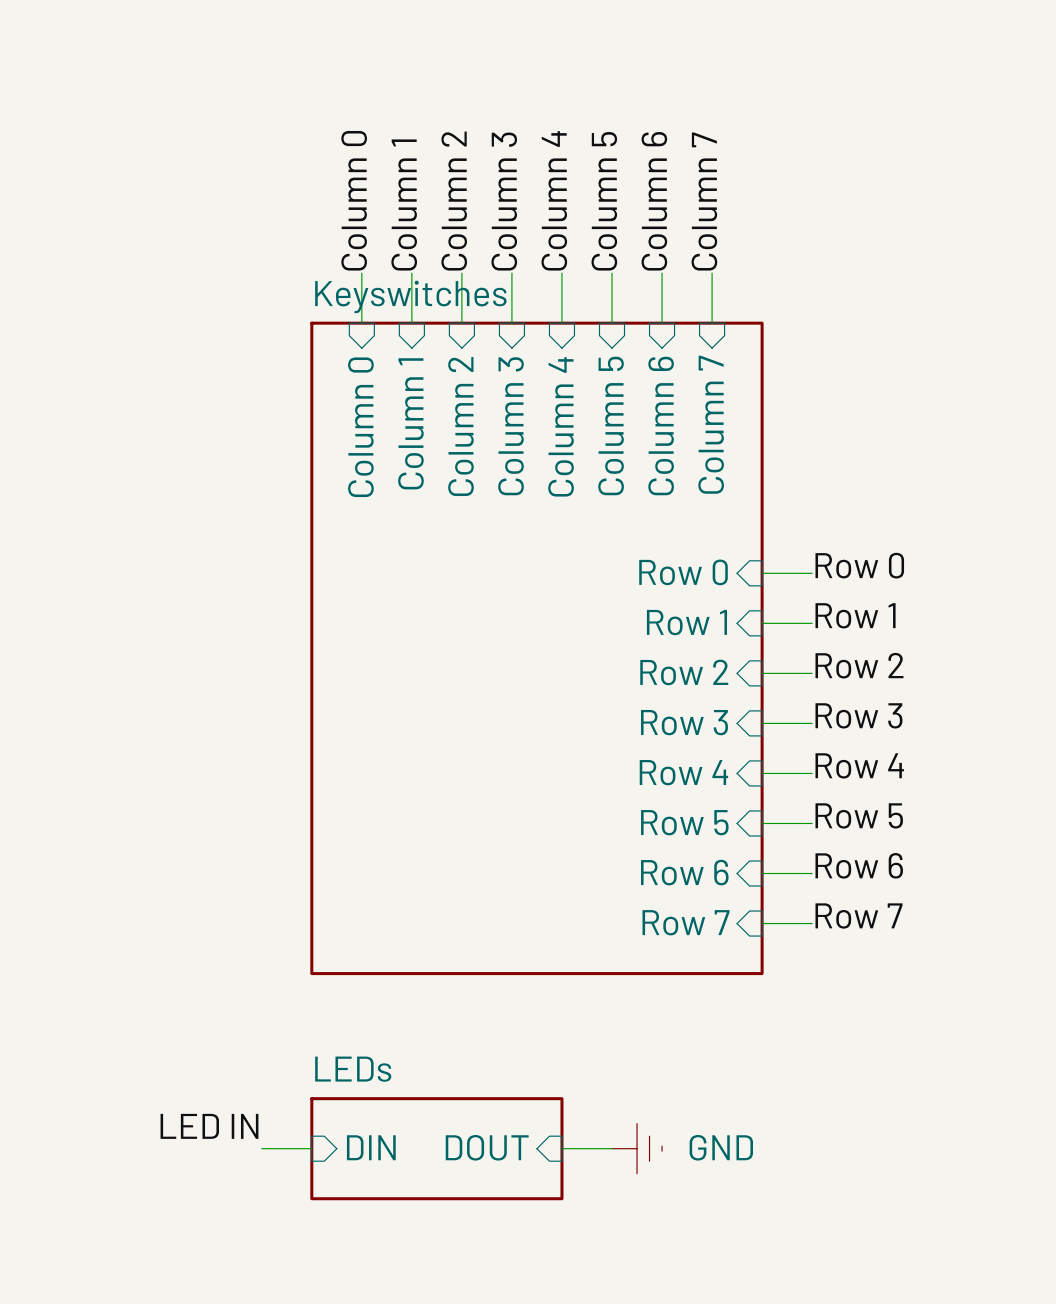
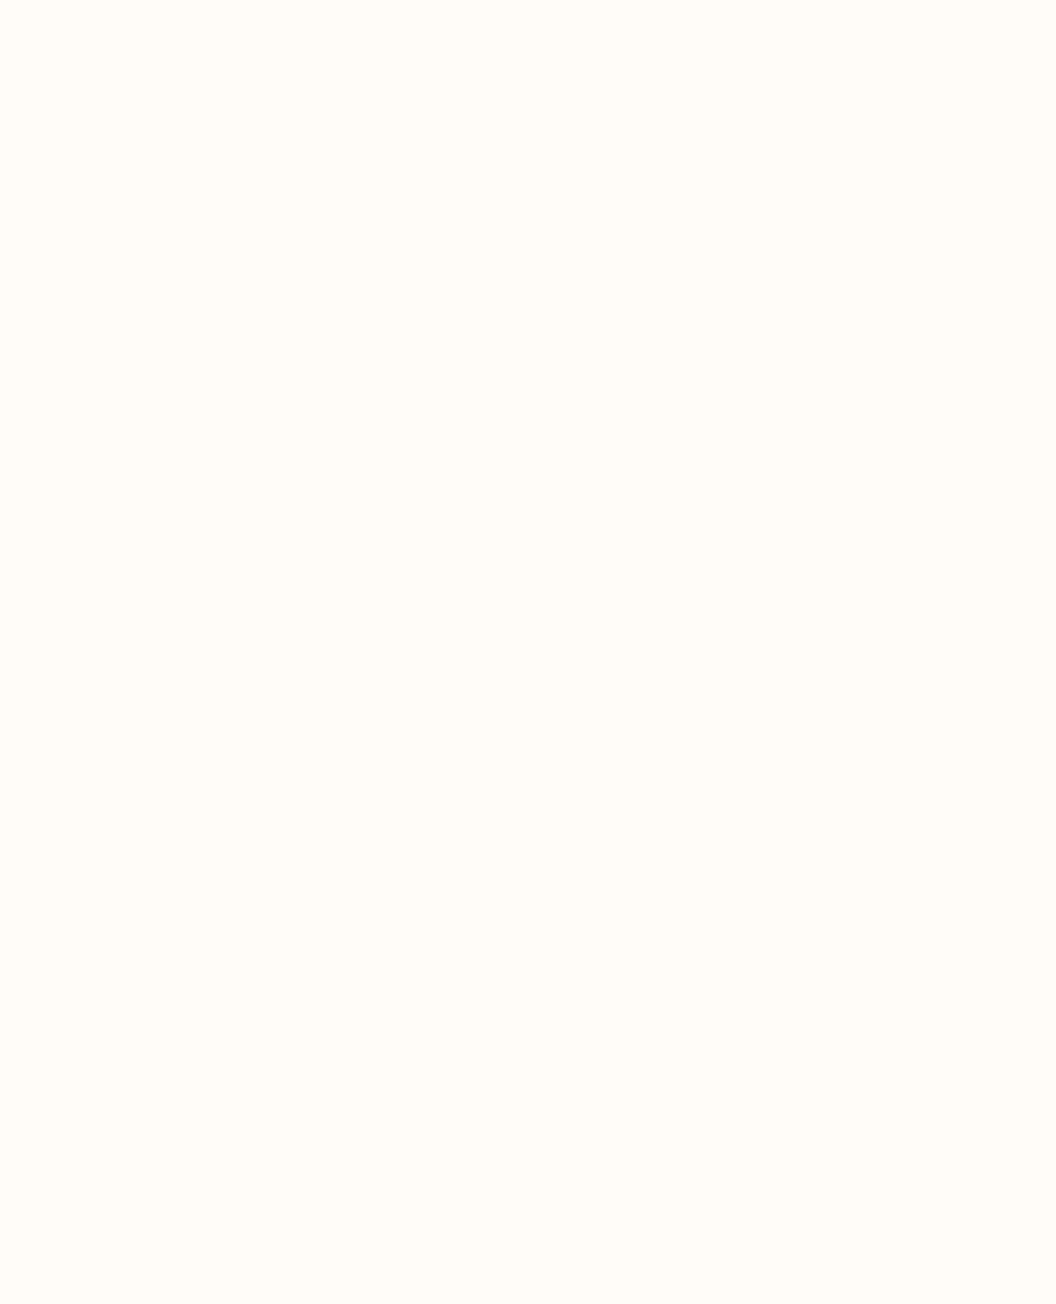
label: Column 0 (354, 200) -> none
label: Column 4 (554, 200) -> none
label: Column 2 (454, 201) -> none
label: Column 3 (504, 201) -> none
label: Column 5 (604, 201) -> none
label: Column 6 (654, 201) -> none
label: Column 7 (704, 201) -> none
label: Column 1 (404, 204) -> none
wire: (361, 273) (361, 323) -> none
wire: (411, 273) (411, 323) -> none
wire: (461, 273) (461, 323) -> none
wire: (511, 273) (511, 323) -> none
wire: (561, 273) (561, 323) -> none
wire: (612, 273) (612, 323) -> none
wire: (662, 273) (662, 323) -> none
wire: (712, 273) (712, 323) -> none
sheet pin: Column 1 (410, 423) -> none
sheet pin: Column 7 (711, 424) -> none
sheet pin: Column 5 (611, 425) -> none
sheet pin: Column 6 (661, 425) -> none
sheet pin: Column 2 (460, 426) -> none
sheet pin: Column 3 (511, 426) -> none
sheet pin: Column 4 (561, 426) -> none
sheet pin: Column 0 (360, 427) -> none
label: Row 0 (859, 565) -> none
sheet pin: Row 0 (683, 572) -> none
wire: (762, 573) (812, 573) -> none
label: Row 1 (855, 615) -> none
sheet pin: Row 1 (686, 622) -> none
wire: (762, 623) (812, 623) -> none
sheet Keyswitches: (536, 648) -> none
label: Row 2 (859, 665) -> none
sheet pin: Row 2 (684, 672) -> none
wire: (762, 673) (812, 673) -> none
label: Row 3 (858, 715) -> none
sheet pin: Row 3 (684, 722) -> none
wire: (762, 723) (812, 723) -> none
label: Row 4 (859, 765) -> none
sheet pin: Row 4 (683, 772) -> none
wire: (762, 773) (812, 773) -> none
label: Row 5 (859, 815) -> none
sheet pin: Row 5 (684, 822) -> none
wire: (762, 823) (812, 823) -> none
label: Row 6 (859, 865) -> none
sheet pin: Row 6 (684, 872) -> none
wire: (762, 873) (812, 873) -> none
label: Row 7 (859, 916) -> none
sheet pin: Row 7 (686, 922) -> none
wire: (762, 923) (812, 923) -> none
label: LED IN (209, 1126) -> none
sheet pin: DIN (371, 1147) -> none
sheet pin: DOUT (487, 1147) -> none
wire: (261, 1148) (311, 1148) -> none
sheet LEDs: (436, 1148) -> none
wire: (561, 1148) (612, 1148) -> none
power symbol: GND (637, 1148) -> none

